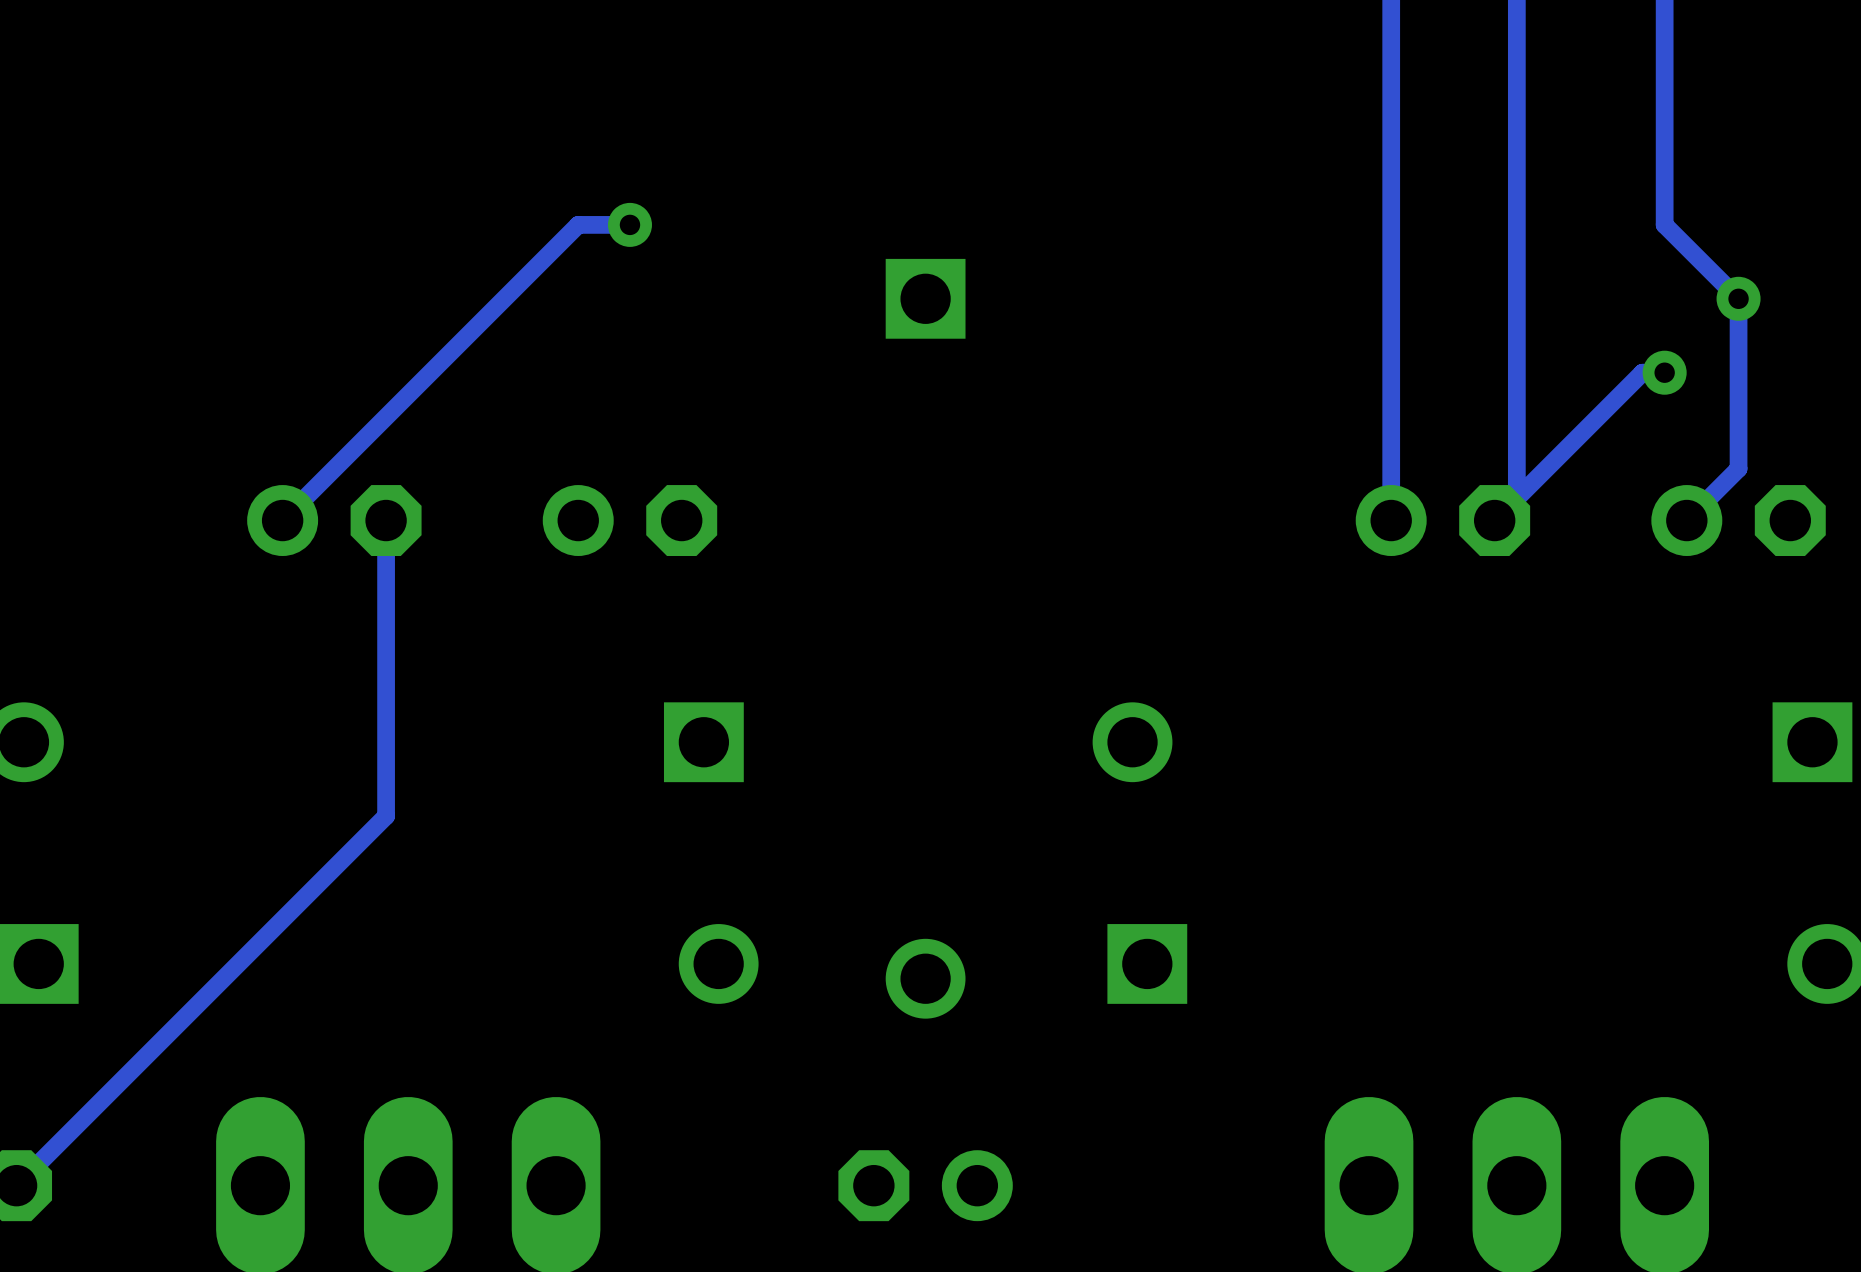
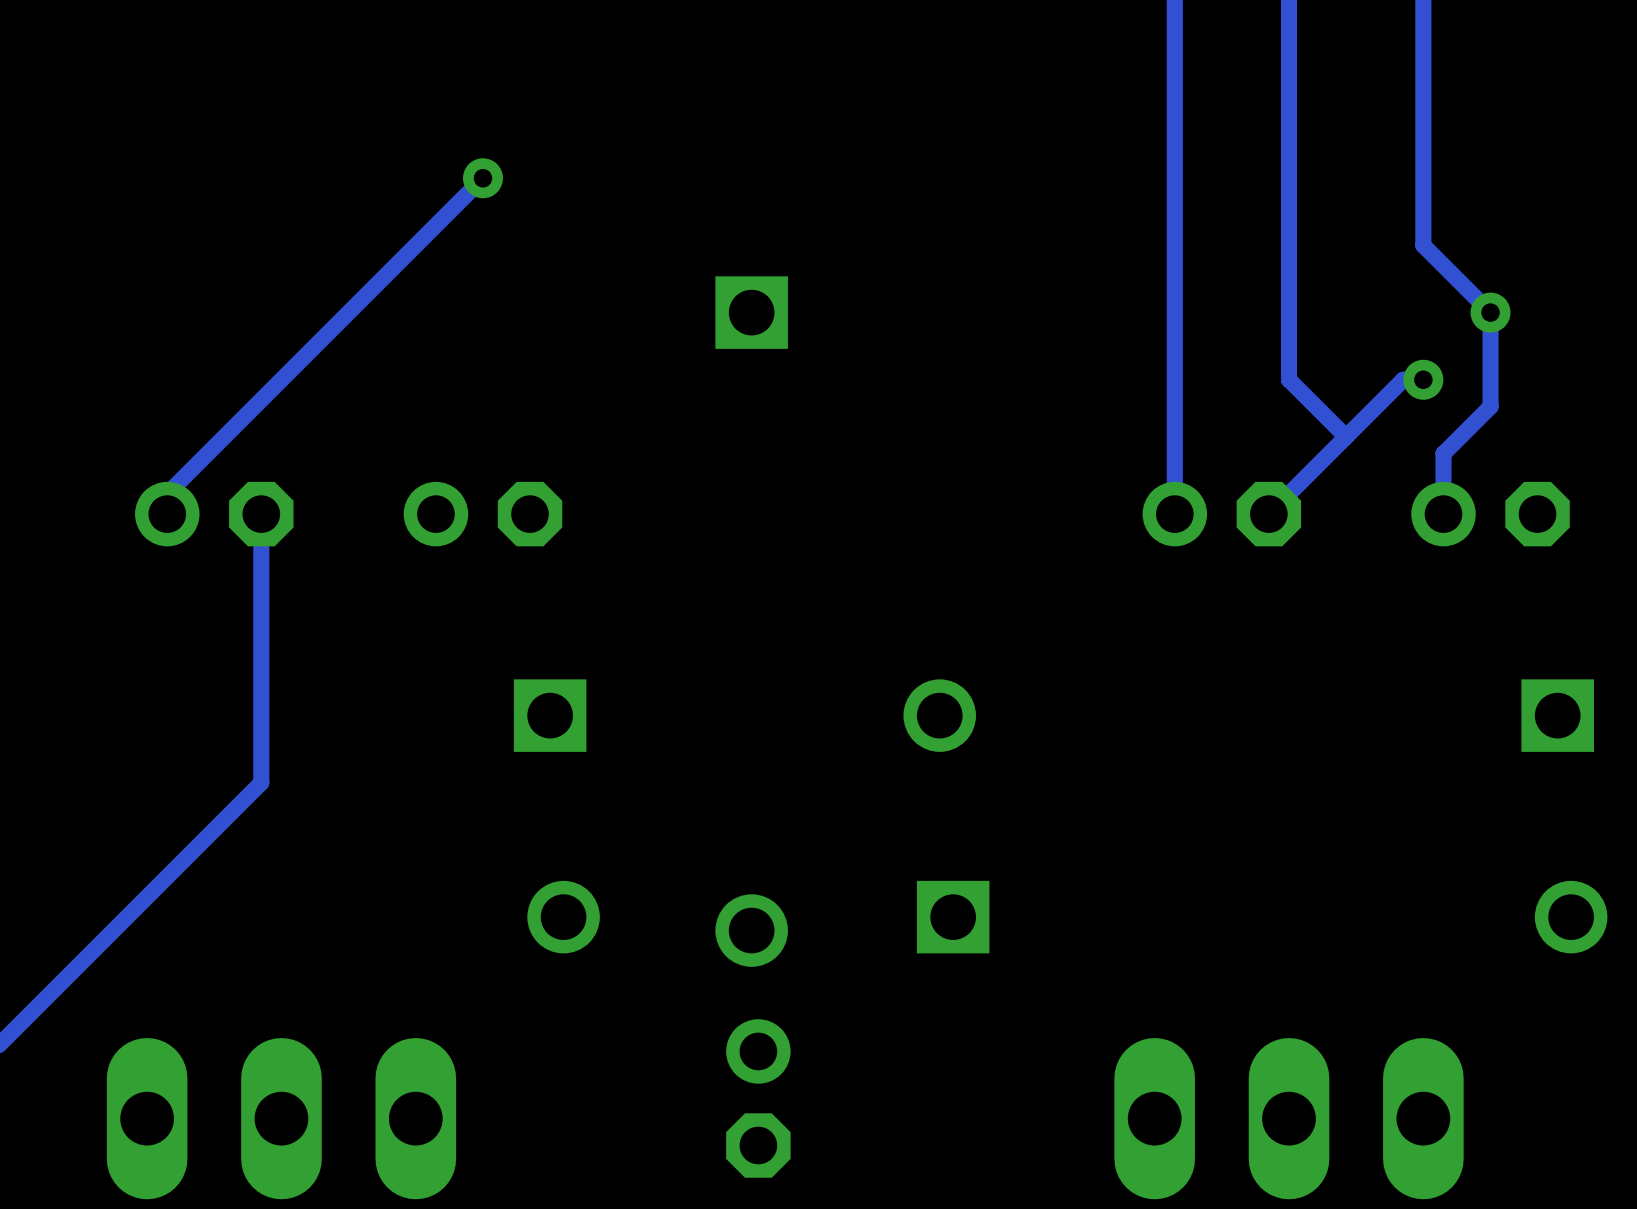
track: (629, 224) (578, 224) (282, 520) -> (482, 178) (167, 493) (167, 514)
via position: (629, 224) -> (482, 178)
track: (1516, 372) (1516, 498) -> (1289, 379) (1346, 436)
track: (1738, 402) (1738, 468) (1686, 520) -> (1490, 406) (1443, 453) (1443, 514)
part rotation: 0° (925, 1185) -> 90° counterclockwise (758, 1098)

